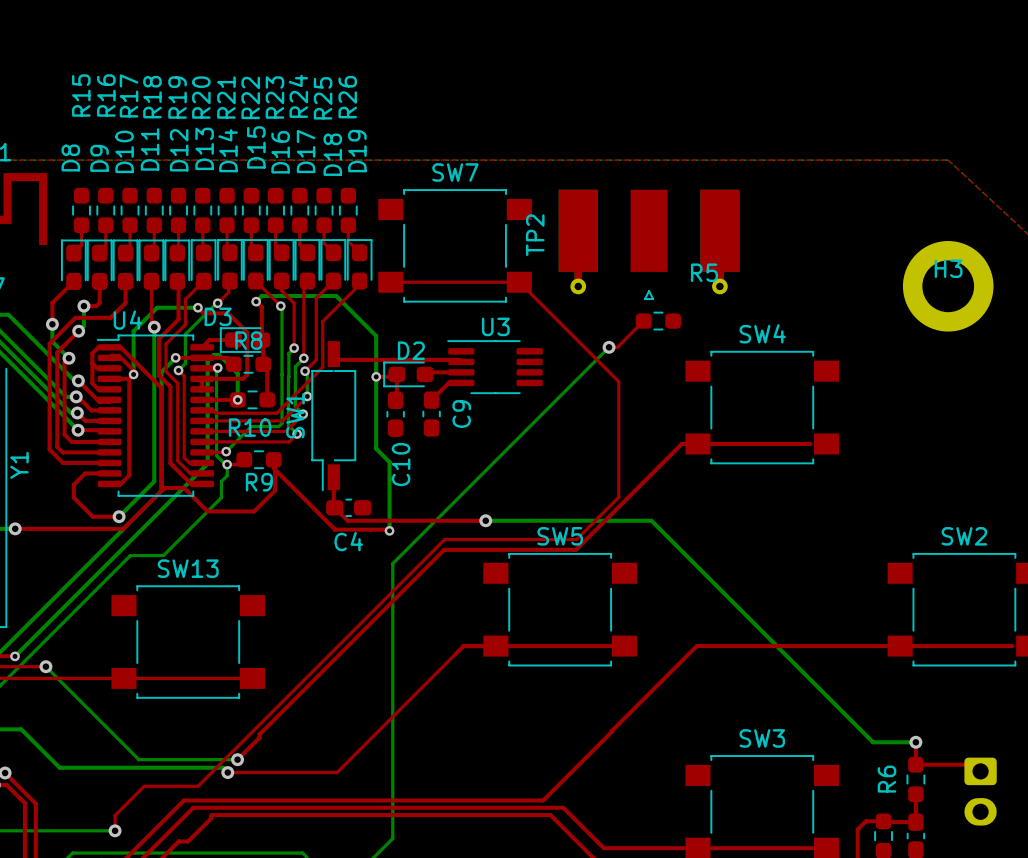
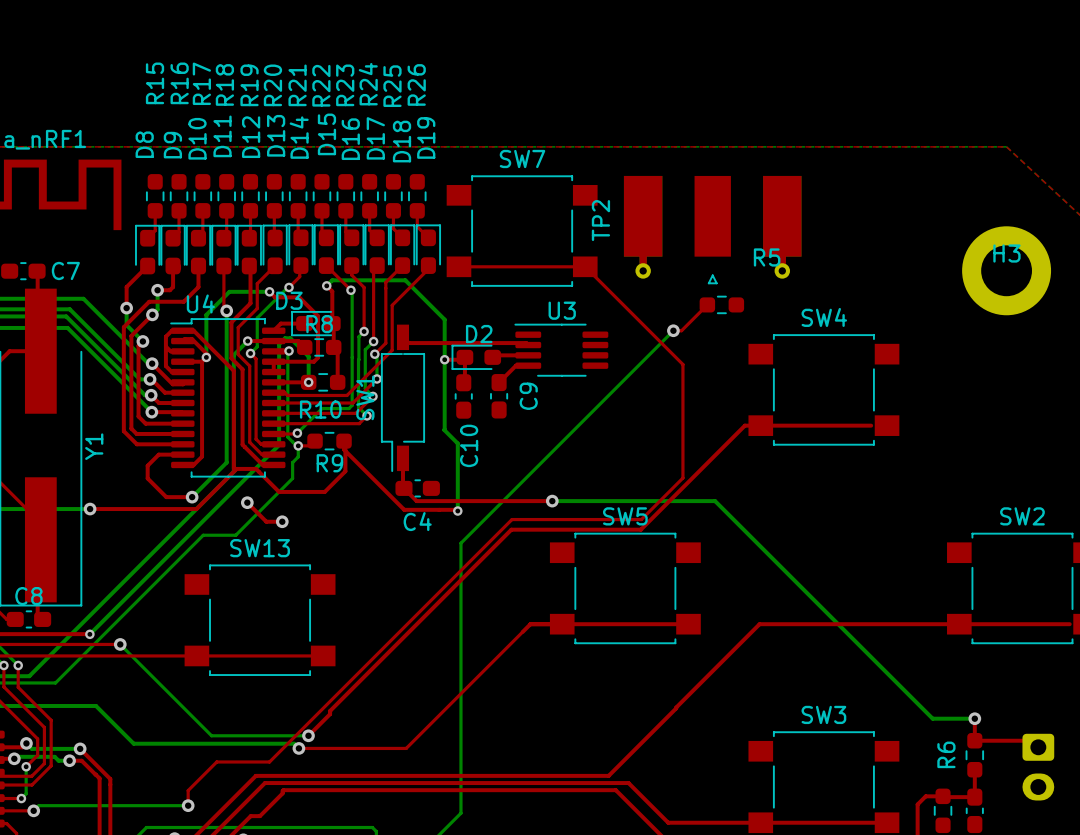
top track: none -> (247, 502) (266, 521) (282, 521)
via: none -> (247, 502)
via: none -> (282, 521)

